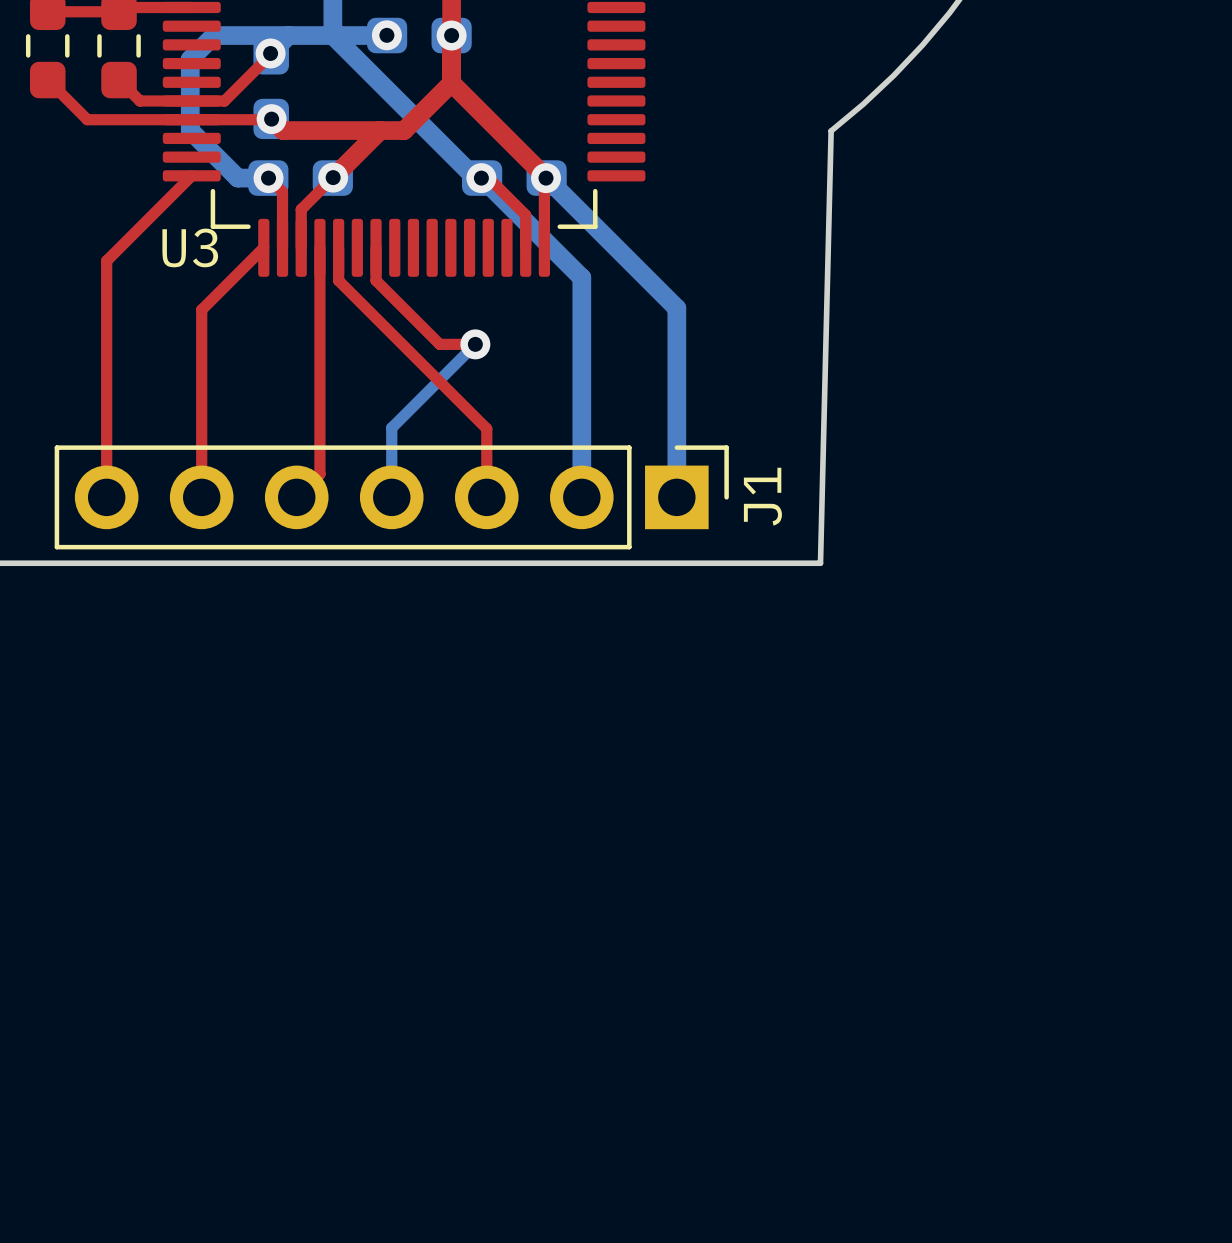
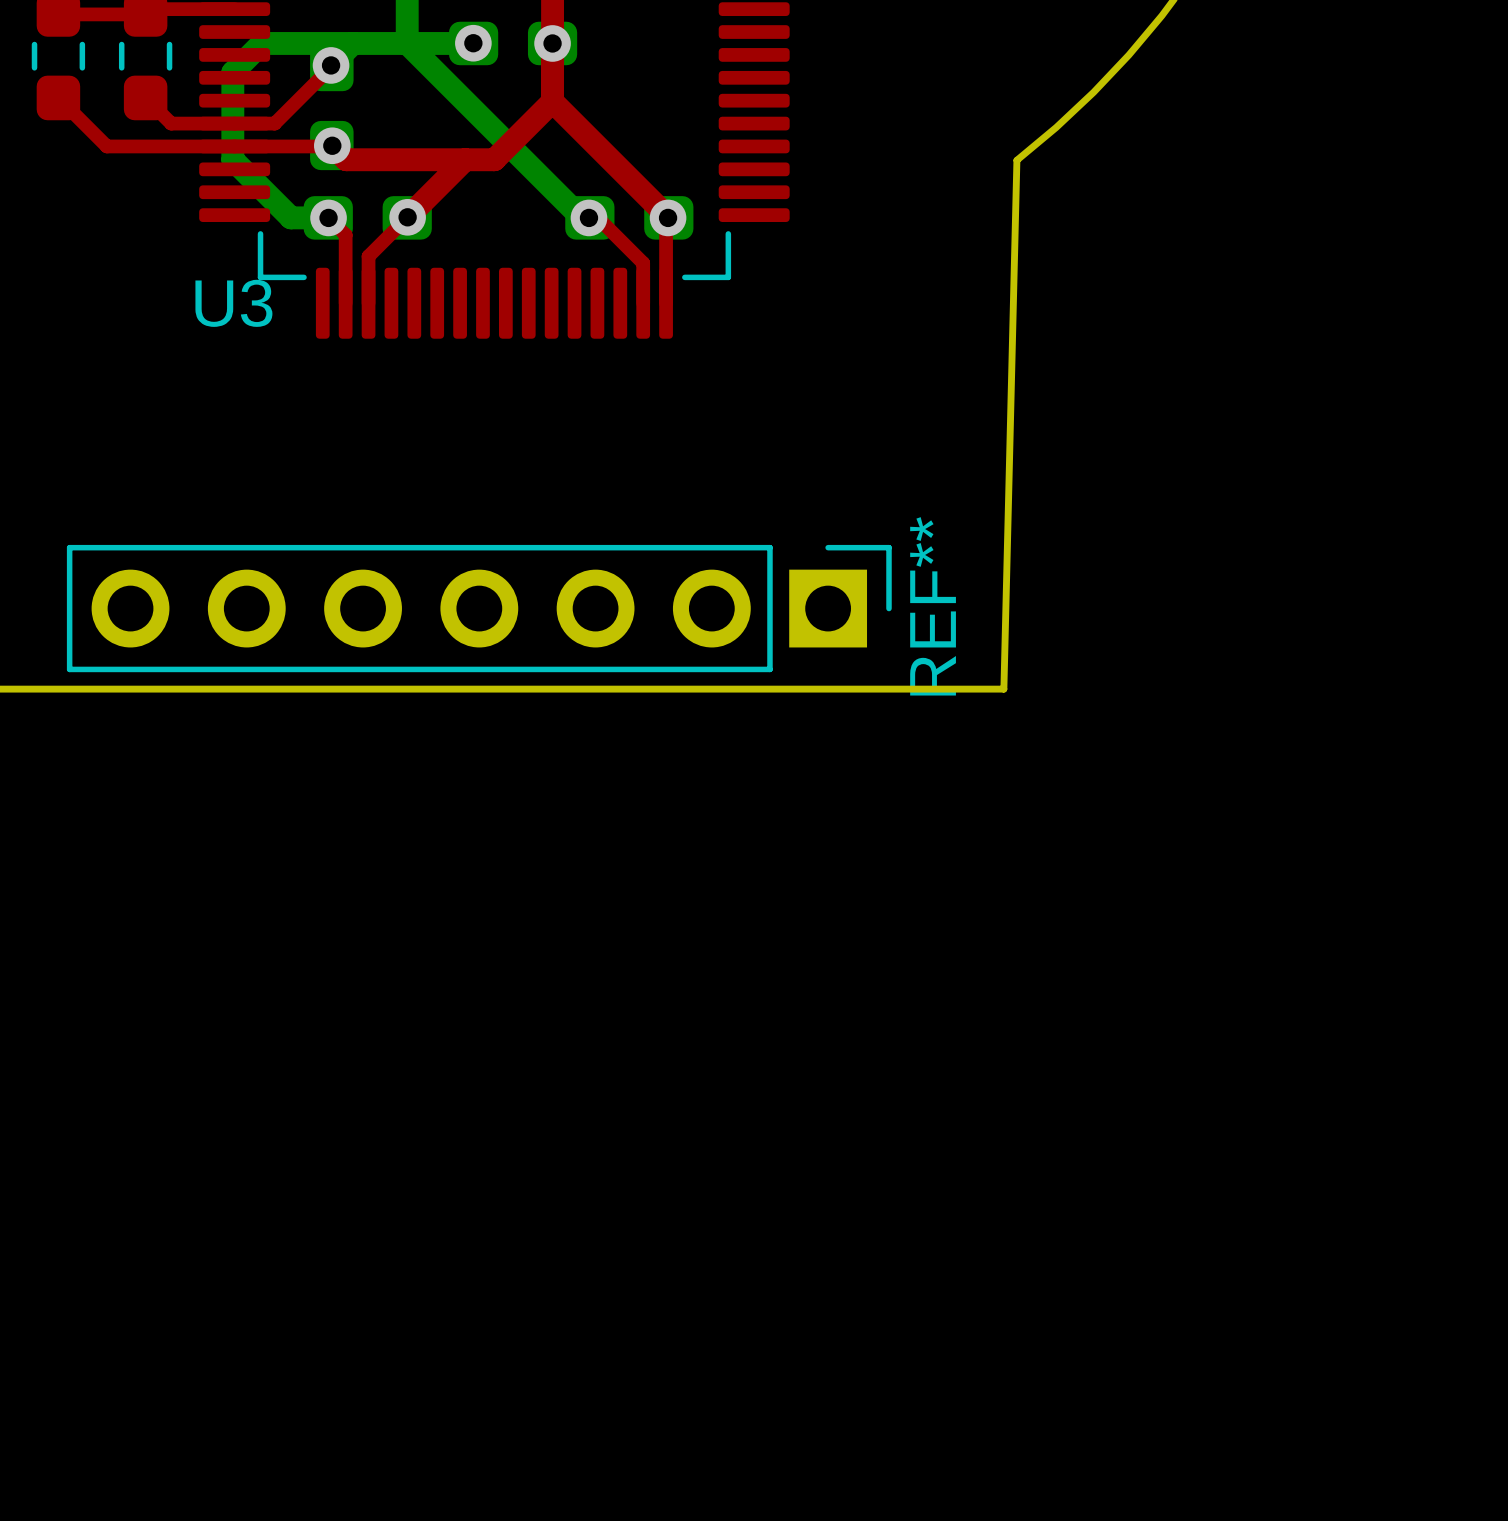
top track: (191, 175) (106, 260) (106, 497) -> none
bottom track: (482, 178) (581, 277) (581, 497) -> none
bottom track: (546, 178) (676, 308) (676, 497) -> none
top track: (263, 247) (201, 309) (201, 497) -> none
top track: (319, 247) (319, 474) (296, 497) -> none
top track: (338, 247) (338, 280) (486, 428) (486, 497) -> none
top track: (376, 247) (376, 280) (439, 344) (475, 344) -> none
bottom track: (475, 344) (391, 427) (391, 497) -> none
via: (475, 344) -> none
J1 name: J1 (762, 496) -> REF** (933, 606)

